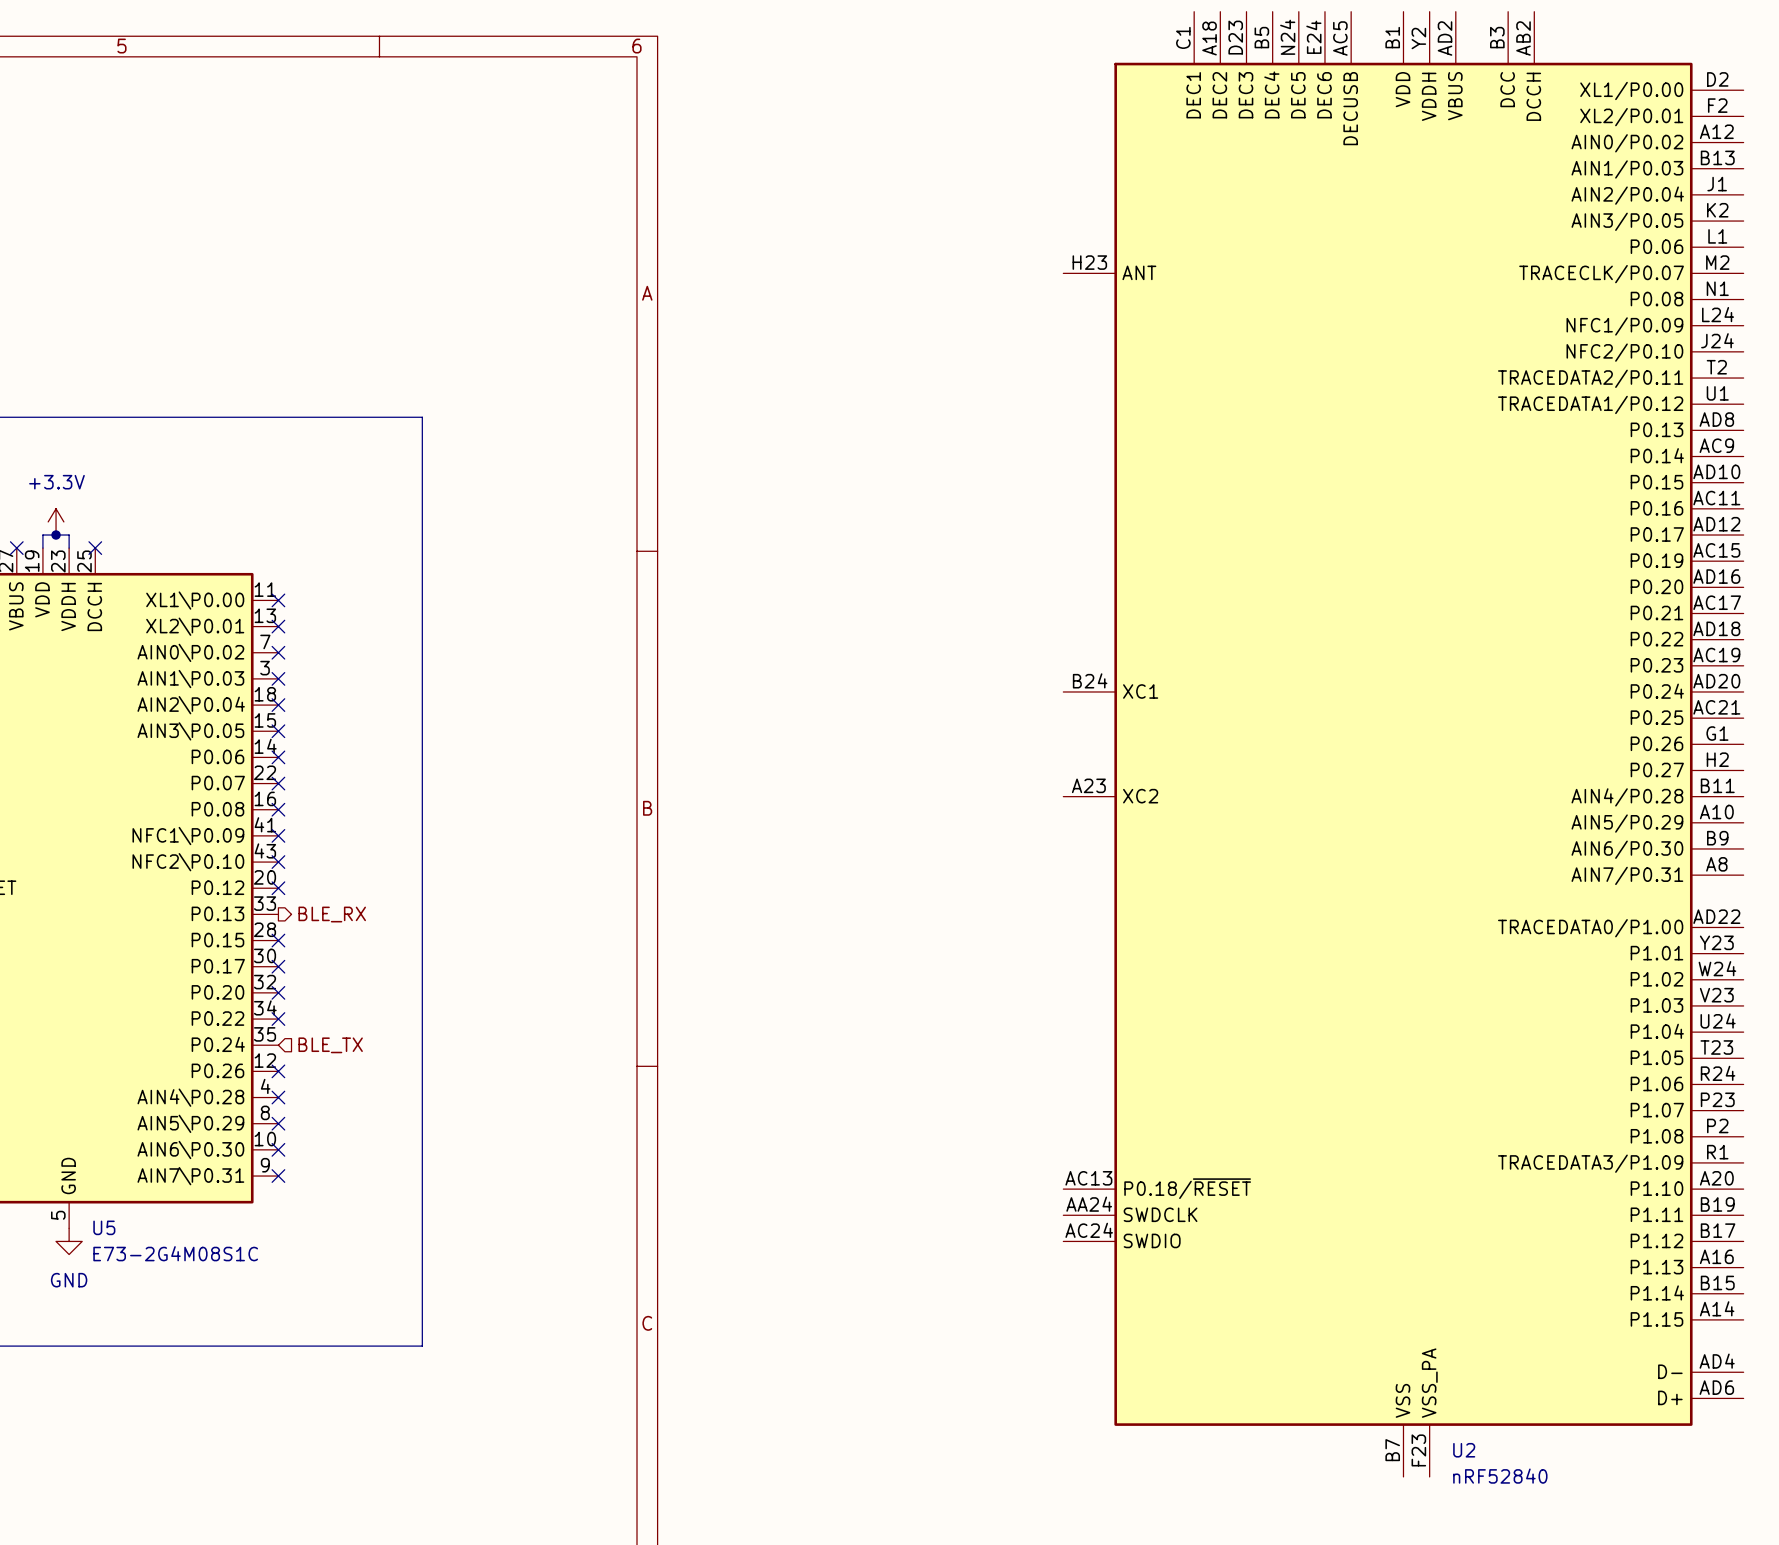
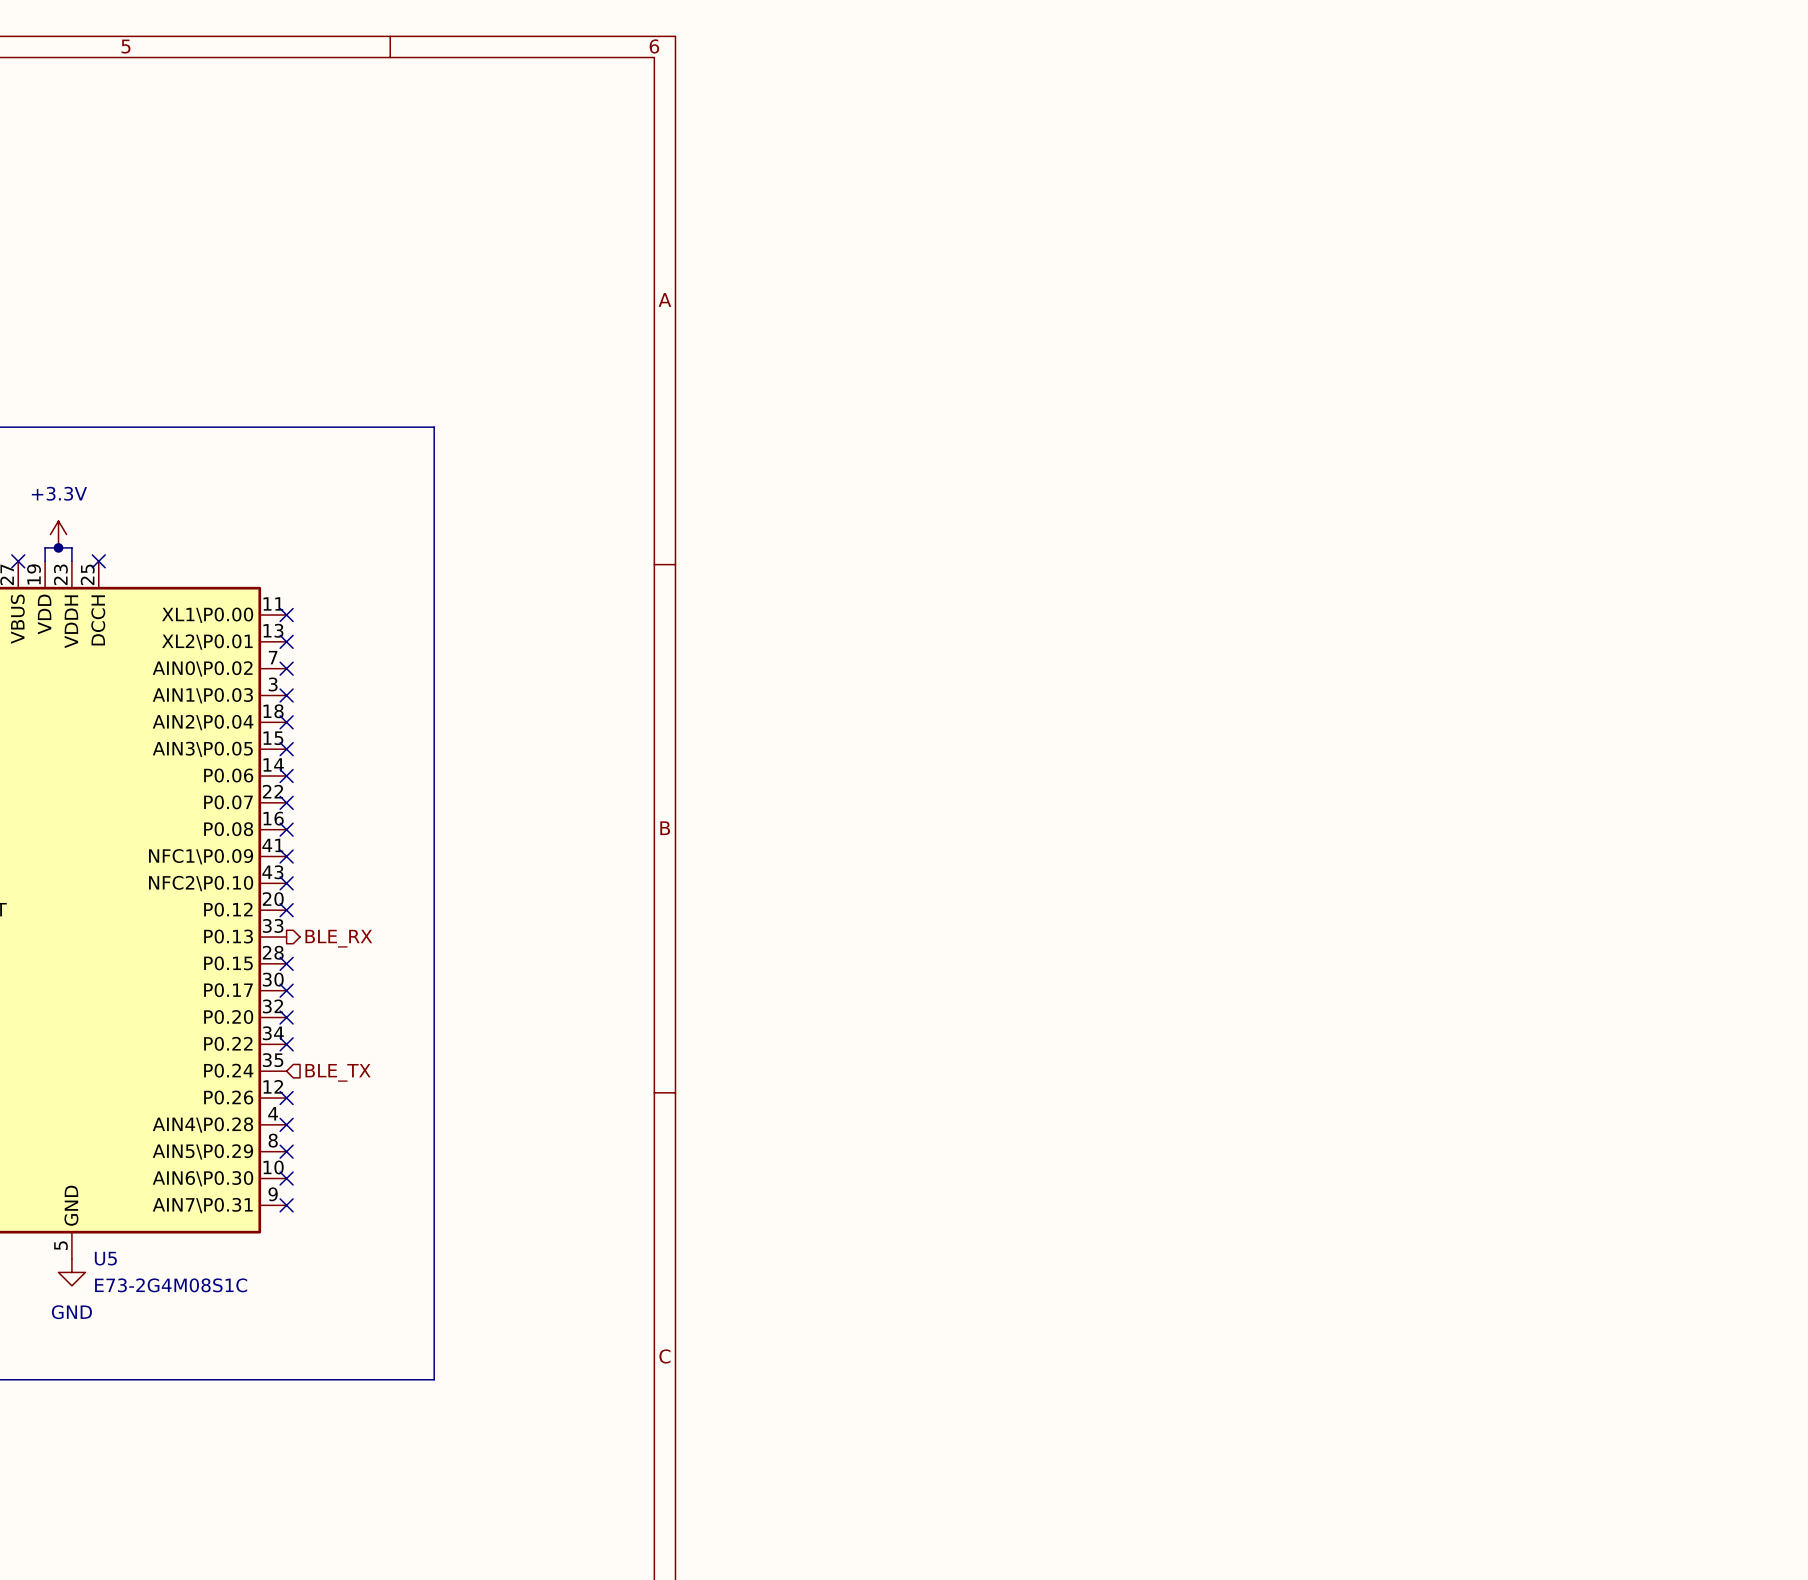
U2: nRF52840 (1403, 744) -> none

